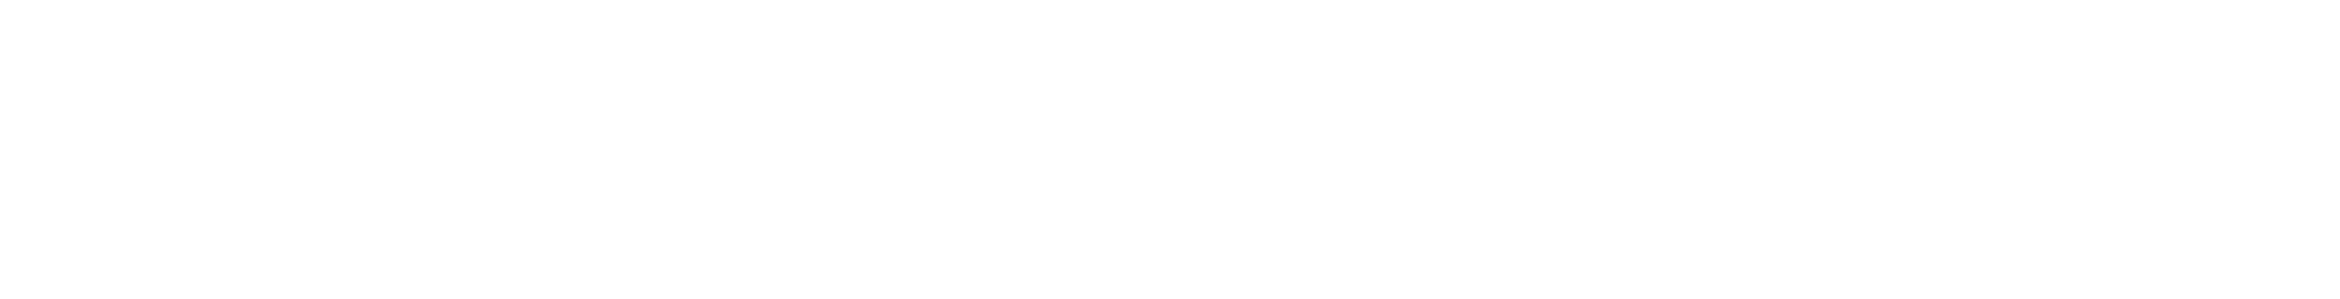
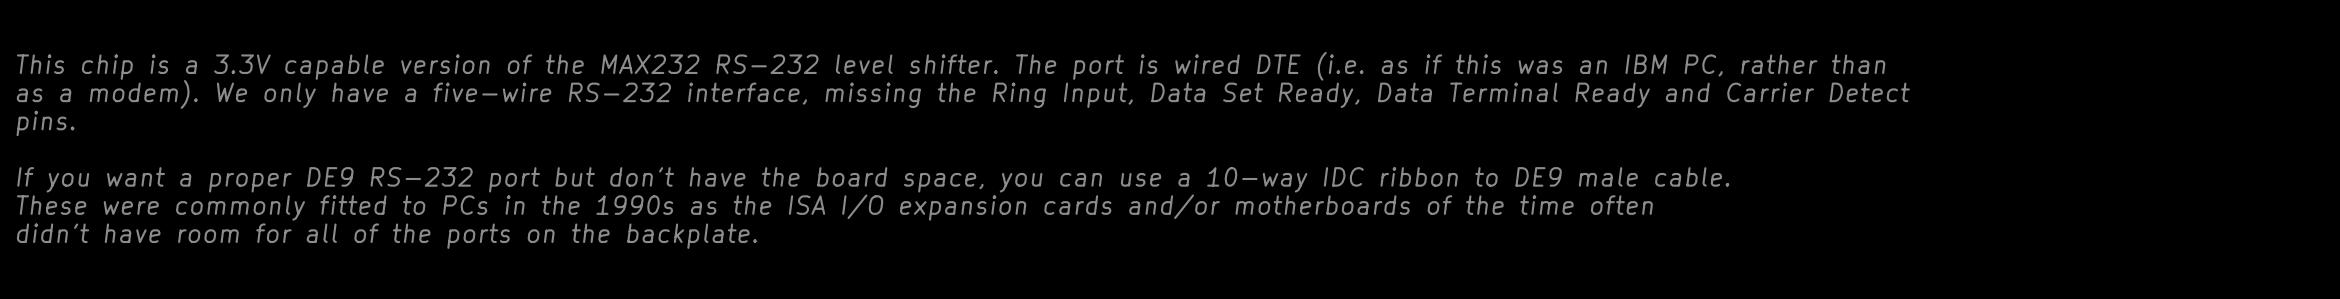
text: none -> This chip is a 3.3V capable version of the MAX232 RS-232 level shifter. The port is wired DTE (i.e. as if this was an IBM PC, rather than (951, 66)
text: none -> as a modem). We only have a five-wire RS-232 interface, missing the Ring Input, Data Set Ready, Data Terminal Ready and Carrier Detect (963, 94)
text: none -> pins. (45, 123)
text: none -> If you want a proper DE9 RS-232 port but don't have the board space, you can use a 10-way IDC ribbon to DE9 male cable. (873, 179)
text: none -> These were commonly fitted to PCs in the 1990s as the ISA I/O expansion cards and/or motherboards of the time often (834, 207)
text: none -> didn't have room for all of the ports on the backplate. (386, 236)

